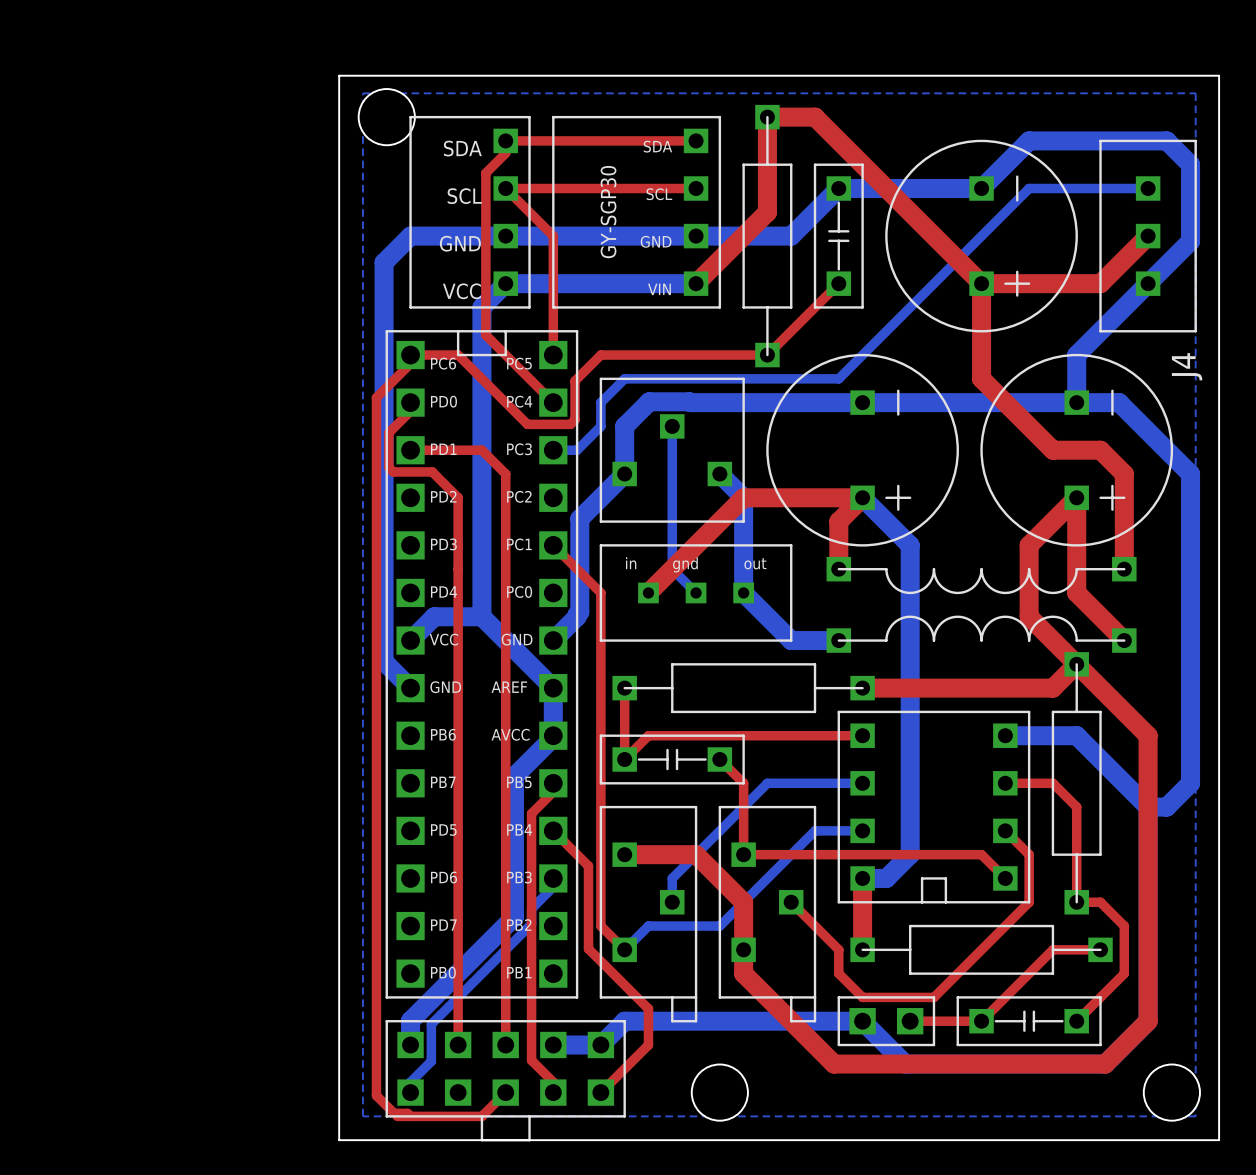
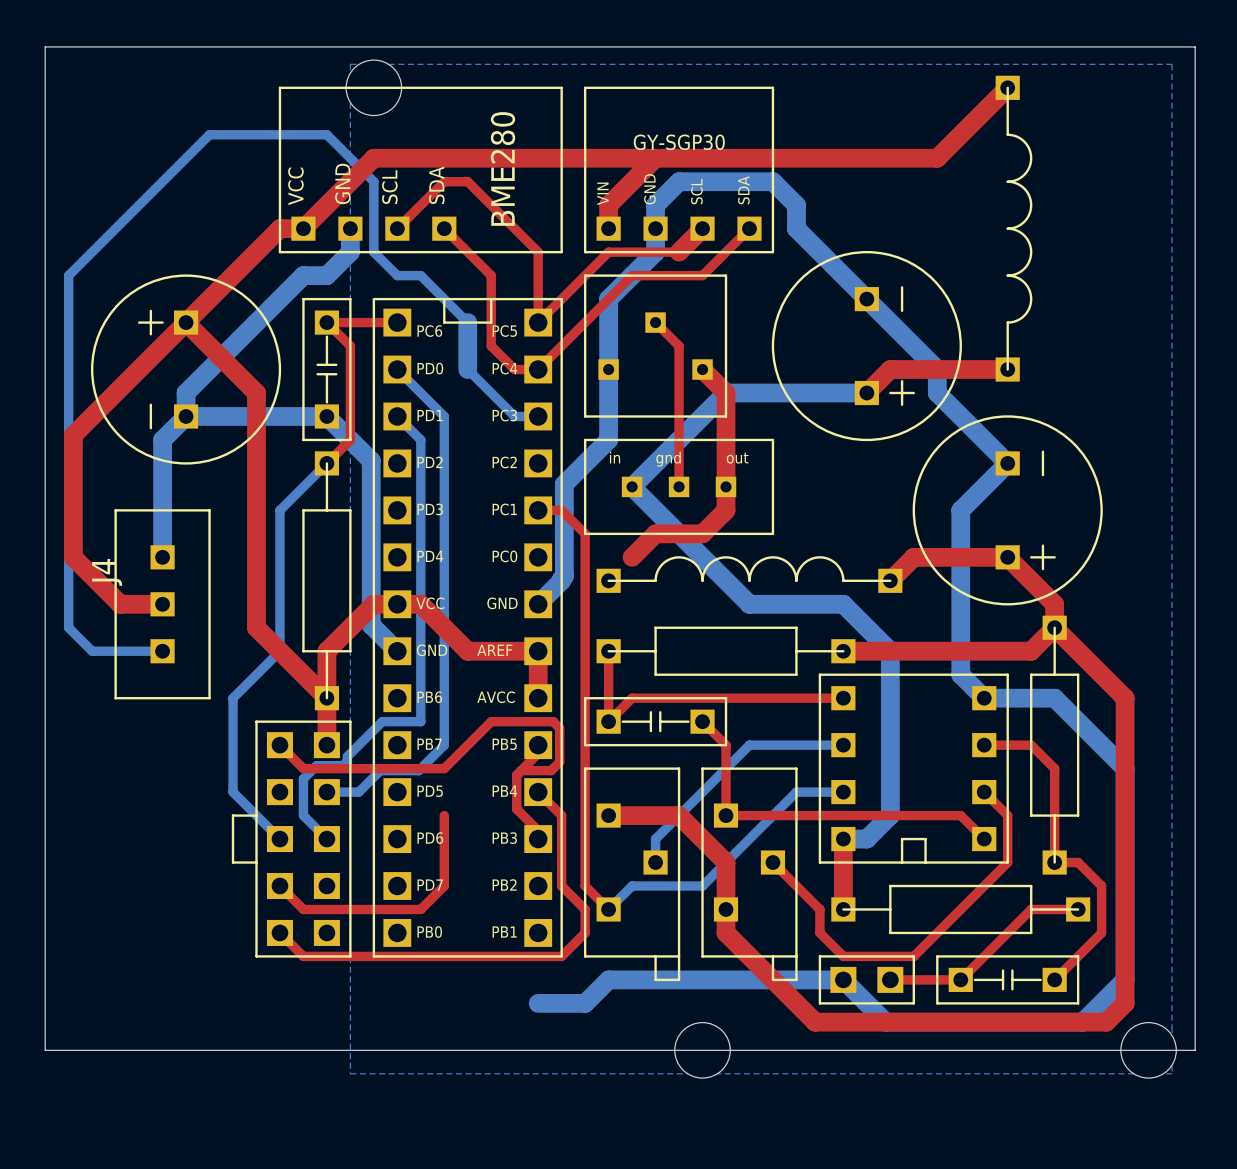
board edge: (339, 75) (339, 1140) (1219, 1140) (1219, 1092) -> (326, 46) (45, 46) (45, 1050) (1195, 1050)
top track: none -> (1007, 87) (937, 158) (679, 158)
top track: (696, 140) (505, 140) (505, 153) (485, 173) (485, 335) (553, 402) -> none
top track: (505, 188) (553, 236) (553, 283) -> (397, 228) (444, 181) (467, 181) (538, 252)
top track: none -> (491, 158) (373, 158) (303, 228) (279, 228) (73, 435) (73, 557) (120, 604) (162, 604)
top track width: thin (505, 188) (696, 188) -> thick (491, 158) (679, 158)
top track: none -> (655, 158) (608, 205) (608, 228) (608, 226)
bottom track: (1148, 188) (1029, 188) (838, 378) (624, 378) (600, 402) (600, 426) (577, 450) (553, 450) -> none
part: none -> (420, 169)
part: none -> (679, 169)
part: (470, 212) -> none
part: (636, 212) -> none
part: (767, 236) -> none
part: (838, 236) -> none
part: (981, 236) -> none
top track: (1148, 236) (1100, 283) (981, 283) -> none
J4 position: (1148, 236) -> (162, 604)
bottom track: none -> (350, 228) (350, 252) (326, 275) (303, 275) (186, 393) (186, 416)
top track: (719, 259) (767, 212) (767, 117) (815, 117) (981, 283) -> none
part: none -> (1014, 228)
top track: none -> (679, 252) (608, 252) (538, 322)
bottom track: (696, 283) (505, 283) (481, 307) (481, 355) -> (162, 651) (92, 651) (68, 627) (68, 275) (209, 134) (326, 134) (373, 181) (373, 252) (397, 275) (420, 275) (467, 322)
top track: (838, 283) (767, 355) (600, 355) -> (749, 228) (702, 275) (632, 275) (585, 322)
top track: (981, 283) (981, 378) (1052, 450) (1100, 450) (1124, 474) (1124, 569) -> none
top track: none -> (186, 322) (256, 393) (256, 627) (326, 698)
top track: none -> (397, 322) (326, 322) (350, 346) (350, 439) (326, 463)
top track: none -> (655, 322) (679, 346) (679, 486)
J4 name position: J4 (1187, 366) -> J4 (107, 572)
part: none -> (655, 346)
top track: (575, 380) (575, 419) (570, 424) (527, 424) (458, 355) (410, 355) (410, 363) (376, 397) (376, 1095) (394, 1113) (407, 1113) (410, 1116) -> (559, 348) (538, 369) (514, 369) (491, 346) (491, 275) (444, 228)
part: none -> (186, 369)
part: none -> (326, 369)
top track: (410, 402) (410, 411) (388, 432) (388, 467) (393, 471) (432, 471) (458, 497) (458, 854) -> none
bottom track: none -> (397, 369) (444, 416) (444, 745) (418, 770) (380, 770) (358, 792) (326, 792)
bottom track: (481, 402) (481, 616) -> (467, 369) (514, 416) (538, 416)
top track: none -> (1007, 369) (890, 369) (866, 393)
bottom track: (1076, 402) (1076, 355) (1190, 241) (1190, 164) (1166, 140) (1029, 140) (981, 188) (838, 188) (791, 236) (410, 236) (384, 262) (384, 495) -> (186, 416) (326, 416) (371, 460)
bottom track: (624, 426) (649, 401) (1119, 402) (1190, 474) (1190, 783) (1166, 807) (1148, 807) -> (608, 393) (608, 299) (655, 252) (655, 205) (679, 181) (772, 181) (796, 205) (796, 228) (937, 369) (937, 393) (1007, 463) (960, 510) (960, 674) (984, 698)
bottom track: (672, 426) (672, 569) (696, 592) -> none
bottom track: none -> (186, 416) (162, 439) (162, 557)
top track: (410, 450) (481, 450) (505, 474) (505, 1045) -> none
bottom track: none -> (397, 416) (420, 439) (420, 721) (382, 721) (347, 756) (347, 761) (343, 765) (316, 765) (303, 778) (303, 815) (326, 839)
part: (672, 450) -> none
part position: (862, 450) -> (866, 346)
part: (1076, 450) -> none
bottom track: (719, 474) (743, 497) (743, 592) (791, 640) -> (866, 393) (726, 393) (632, 486) (749, 604) (772, 604)
bottom track: none -> (326, 463) (279, 510) (279, 651) (233, 698) (233, 792) (279, 839)
bottom track: (862, 497) (910, 545) (910, 688) -> (819, 604) (843, 604) (890, 651)
top track: (553, 545) (600, 592) -> (538, 510) (561, 510) (585, 533) (585, 557)
part: none -> (1007, 510)
top track: (672, 569) (743, 497) (862, 497) (838, 521) (838, 569) -> (655, 533) (702, 533) (726, 510) (726, 393) (702, 369)
part: (981, 575) -> none
part position: (696, 592) -> (679, 486)
part: none -> (749, 574)
part: none -> (326, 580)
bottom track: (481, 616) (553, 688) (553, 737) (514, 776) (514, 916) (410, 1020) (410, 1045) -> none
bottom track: (481, 616) (434, 616) (410, 640) -> none
part: (981, 634) -> none
top track: (1124, 640) (1076, 592) (1076, 497) (1029, 545) (1029, 616) (1076, 664) -> (890, 580) (913, 557) (1007, 557) (1054, 604) (1054, 627)
top track: none -> (538, 698) (538, 651) (467, 651) (420, 604) (373, 604) (326, 651) (326, 745)
top track: none -> (279, 745) (303, 768) (444, 768) (491, 721) (553, 721) (559, 728) (559, 762) (551, 770) (521, 770)
top track: (531, 848) (531, 1060) (553, 1082) (553, 1092) -> (516, 809) (538, 830) (538, 839)
top track: (577, 854) (588, 866) (588, 948) (648, 1008) (648, 1045) (600, 1092) -> (561, 815) (561, 886) (585, 909) (585, 932) (561, 956) (303, 956) (279, 932)
bottom track: (553, 878) (553, 887) (531, 908) (531, 923) (431, 1024) (431, 1061) (410, 1082) (410, 1092) -> none
top track: (458, 926) (458, 1045) -> (444, 886) (420, 909) (303, 909) (279, 886)
top track: (1148, 1021) (1105, 1064) -> (1125, 979) (1125, 1003) (1106, 1022) (1082, 1022)
part rotation: 0° (505, 1080) -> 90° clockwise (291, 839)
part position: (505, 1080) -> (291, 839)
top track: (505, 1092) (481, 1116) (397, 1116) -> none

